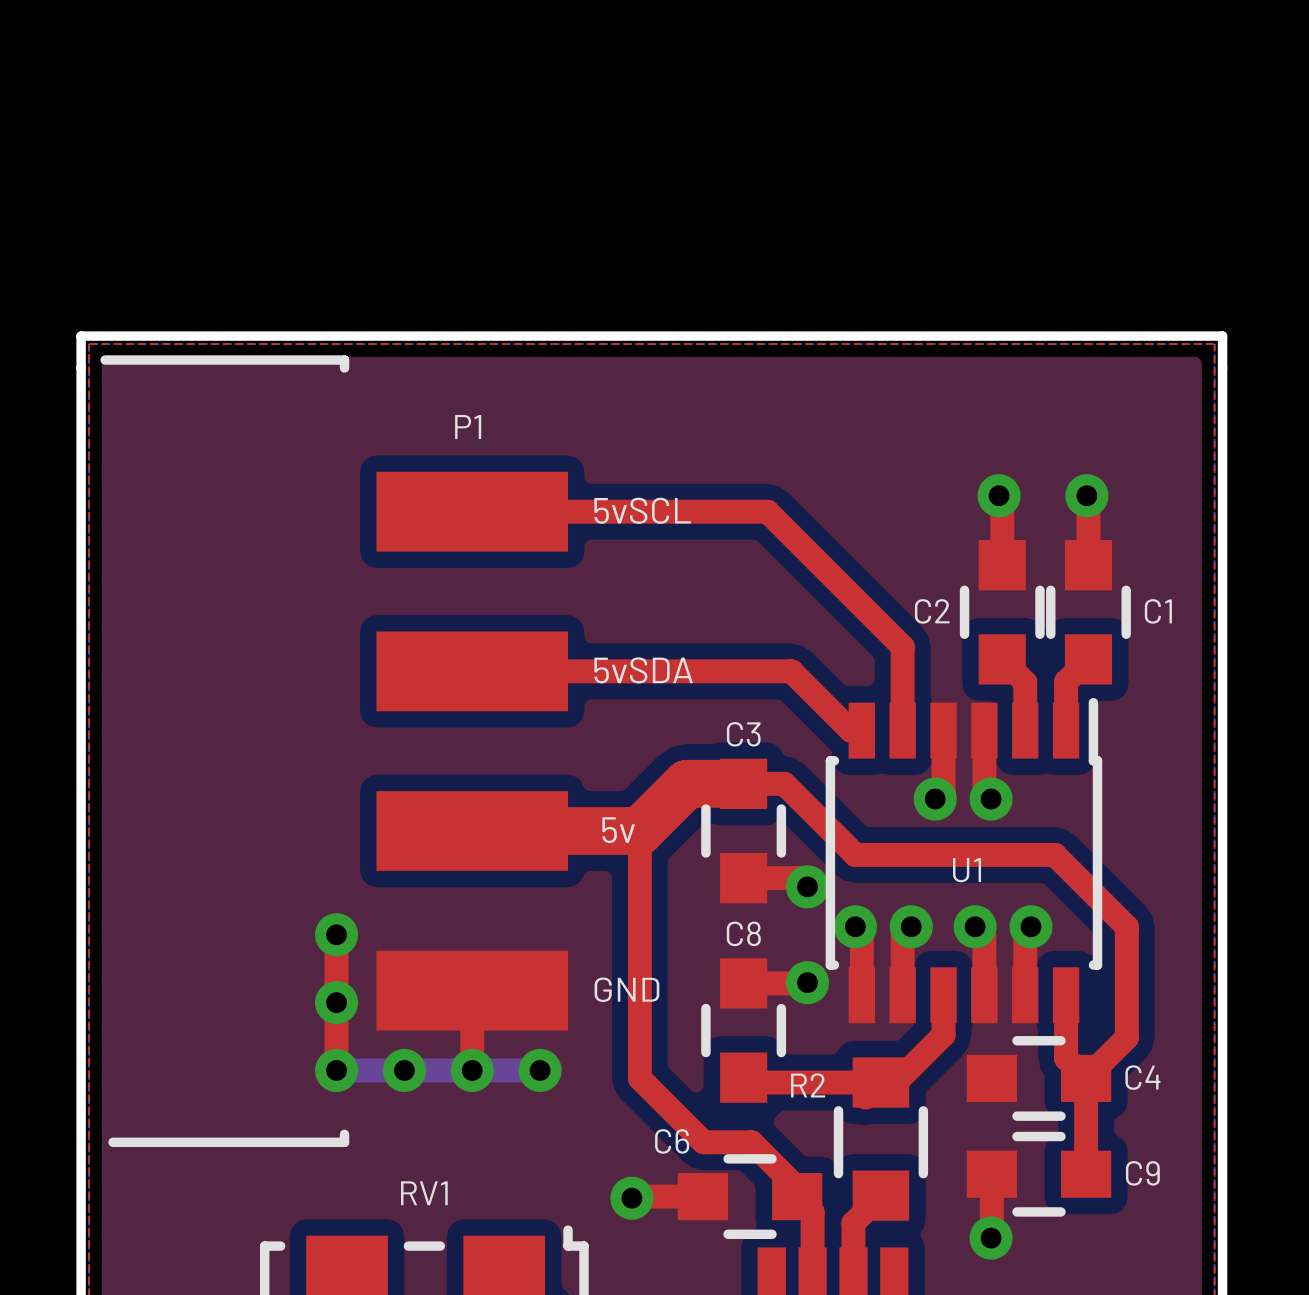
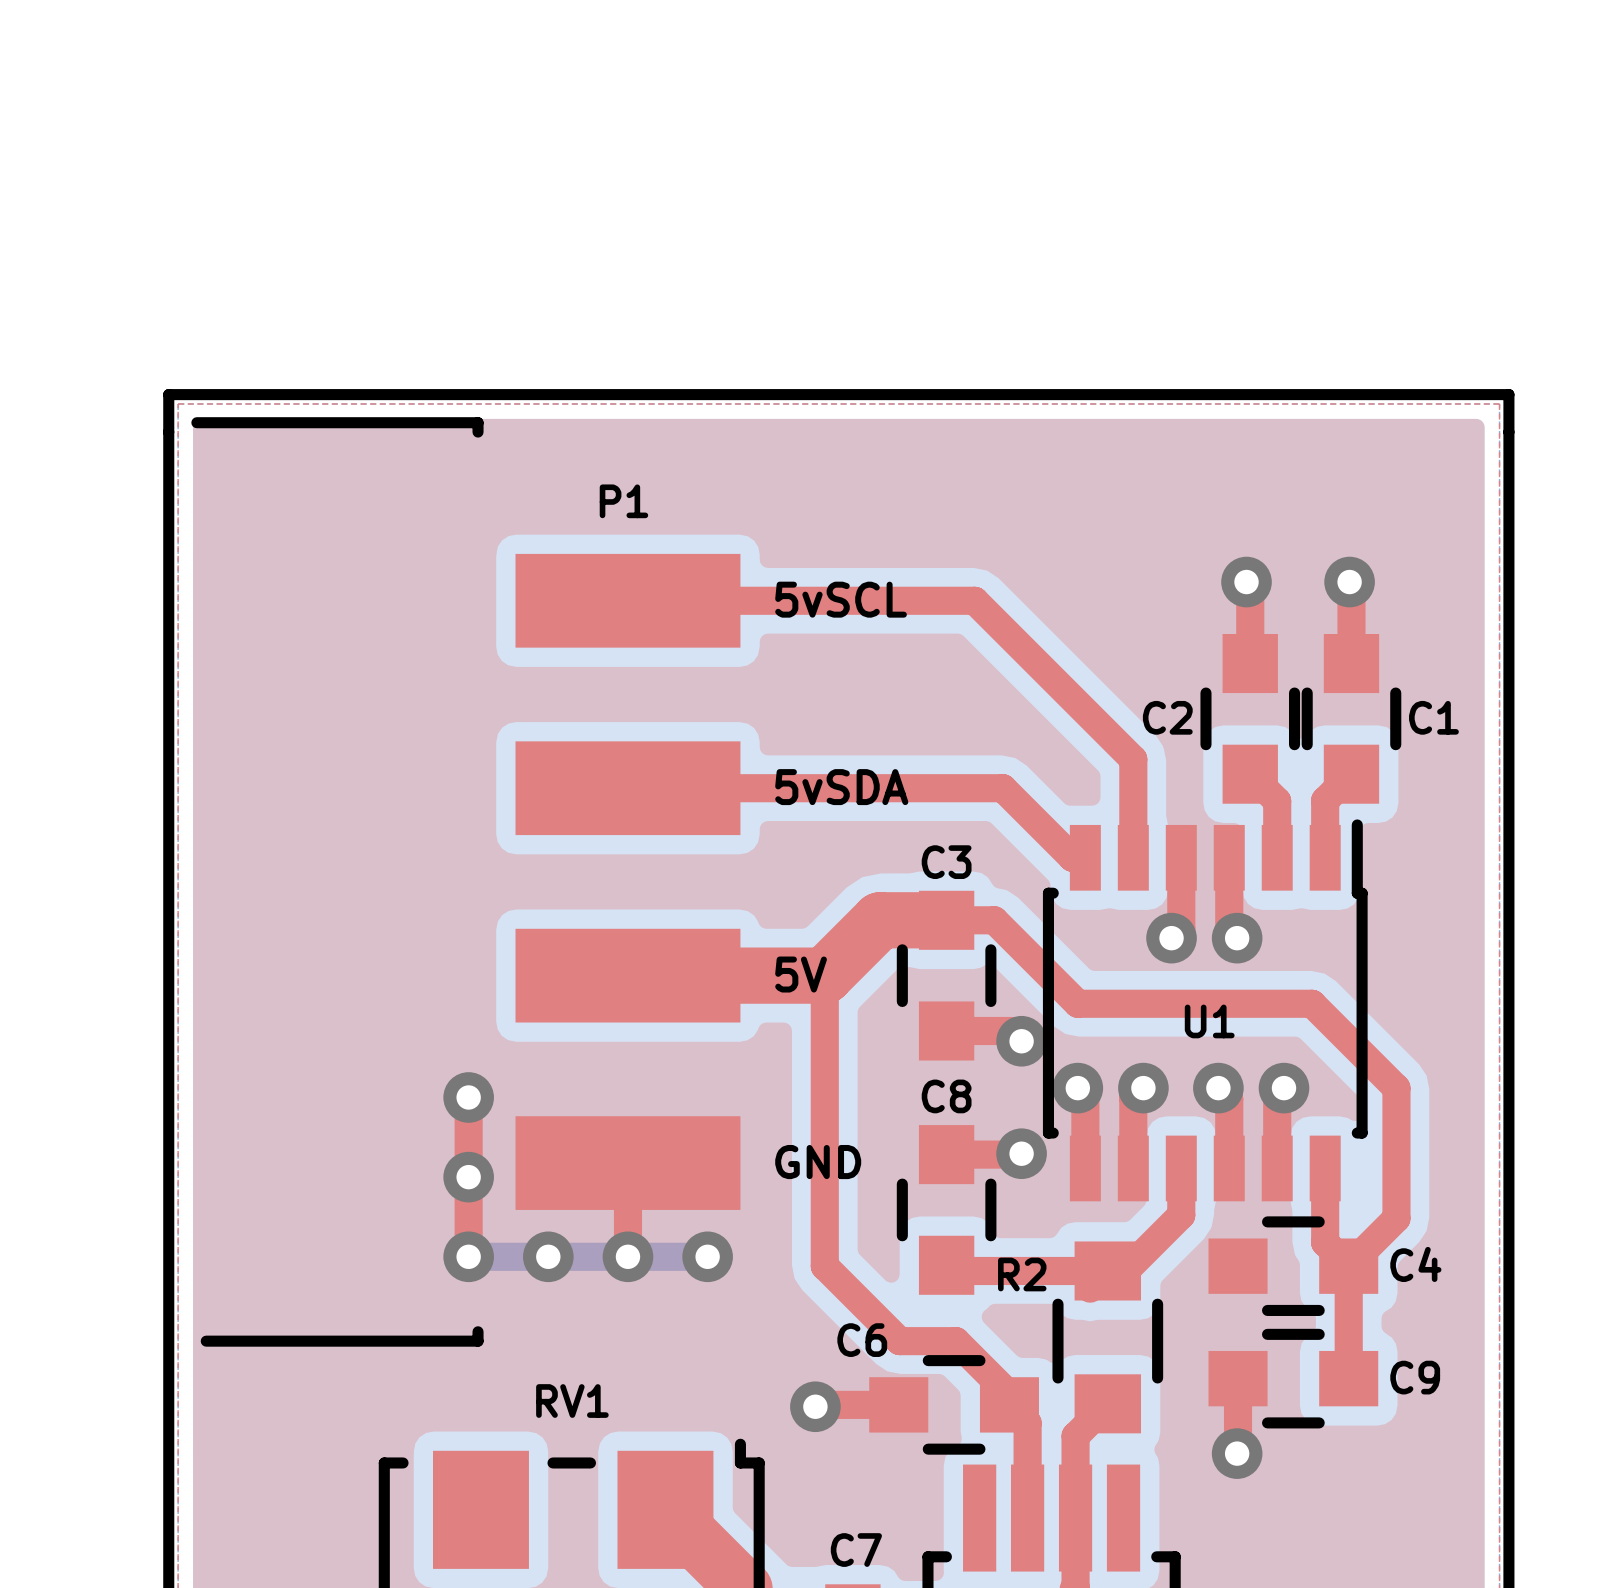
text: 5v (618, 830) -> 5V (801, 974)

